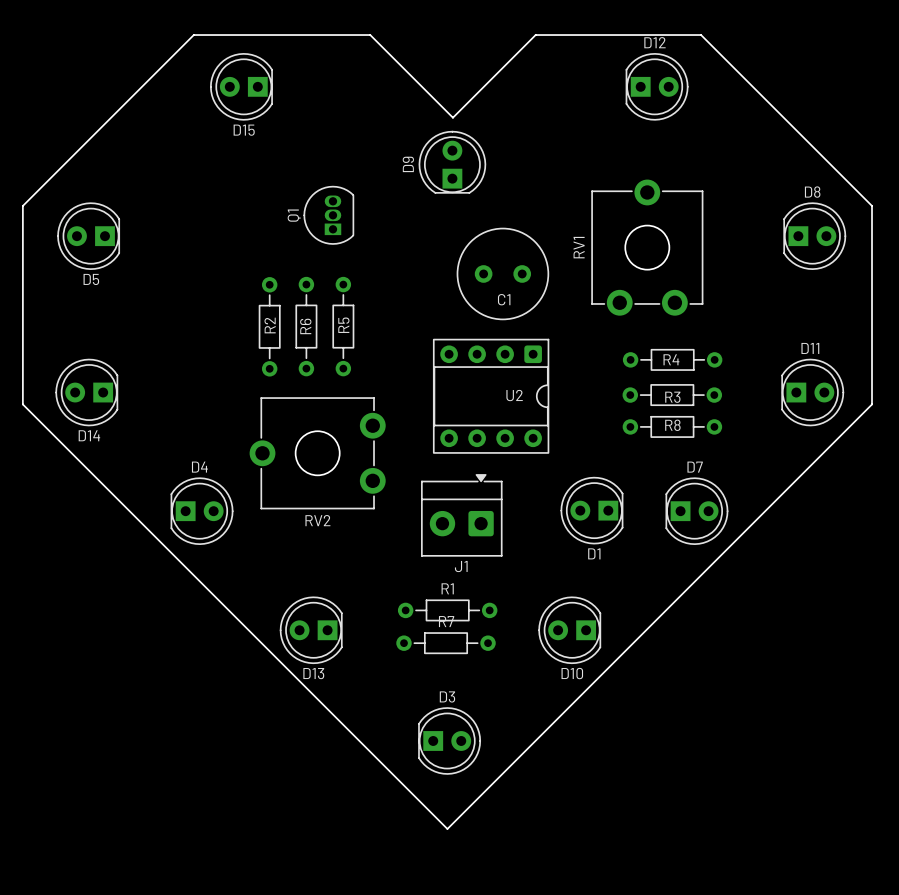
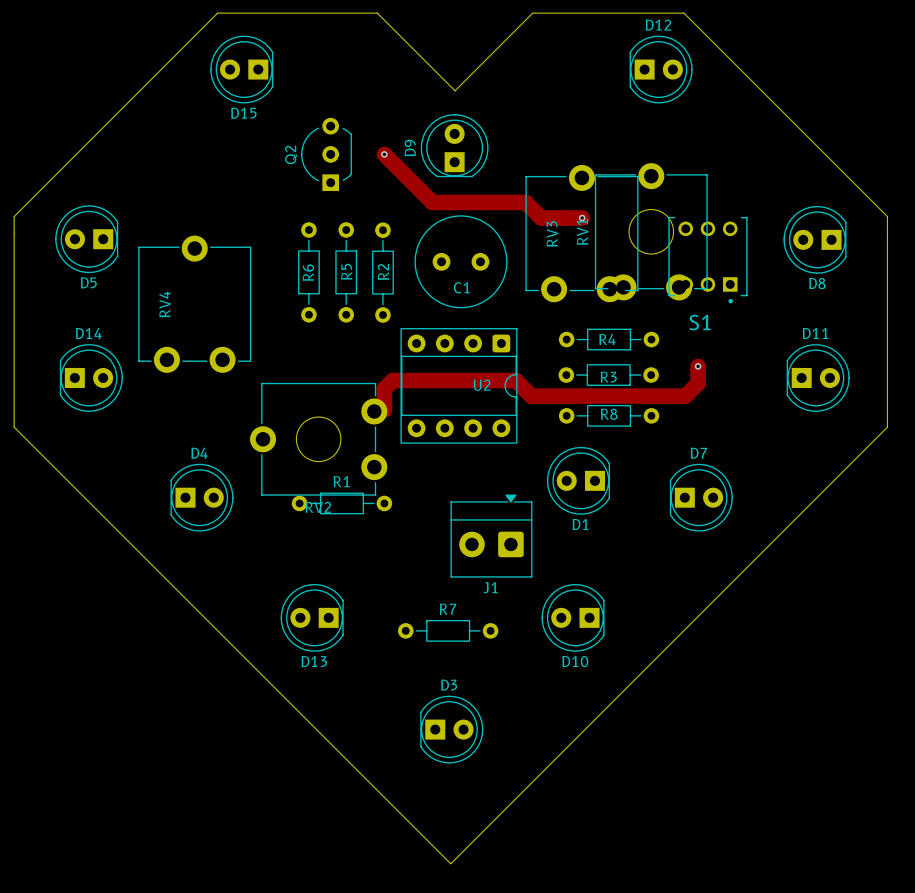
board edge: (193, 35) (370, 35) (452, 117) (535, 35) (701, 35) (872, 205) (872, 404) (447, 828) (22, 404) (22, 205) (193, 35) -> (217, 13) (14, 216) (14, 427) (450, 863) (887, 427) (887, 216) (683, 13) (532, 13) (455, 90) (377, 13) (217, 13)
Q2: none -> (326, 154)
track: none -> (384, 154) (432, 202) (525, 202) (541, 218) (582, 218)
via: none -> (384, 154)
Q1: (328, 215) -> none
via: none -> (582, 218)
D5 position: (88, 236) -> (86, 239)
D8 rotation: 0° (814, 236) -> 180° (815, 239)
RV3: none -> (581, 233)
C1 position: (502, 273) -> (460, 261)
S1: none -> (707, 260)
RV4: none -> (194, 304)
R2 position: (269, 326) -> (382, 272)
R6 position: (306, 326) -> (308, 272)
R5 position: (343, 326) -> (346, 272)
R4 position: (672, 359) -> (609, 339)
track: none -> (698, 366) (698, 383) (685, 396) (531, 396) (515, 380) (392, 380) (384, 389) (384, 410)
via: none -> (698, 366)
D14 rotation: 0° (86, 392) -> 180° (91, 377)
R3 position: (672, 395) -> (608, 375)
U2 position: (491, 396) -> (458, 385)
R8 position: (672, 426) -> (609, 415)
D1 position: (591, 510) -> (578, 480)
J1 position: (461, 515) -> (491, 536)
R1 position: (447, 610) -> (341, 503)

